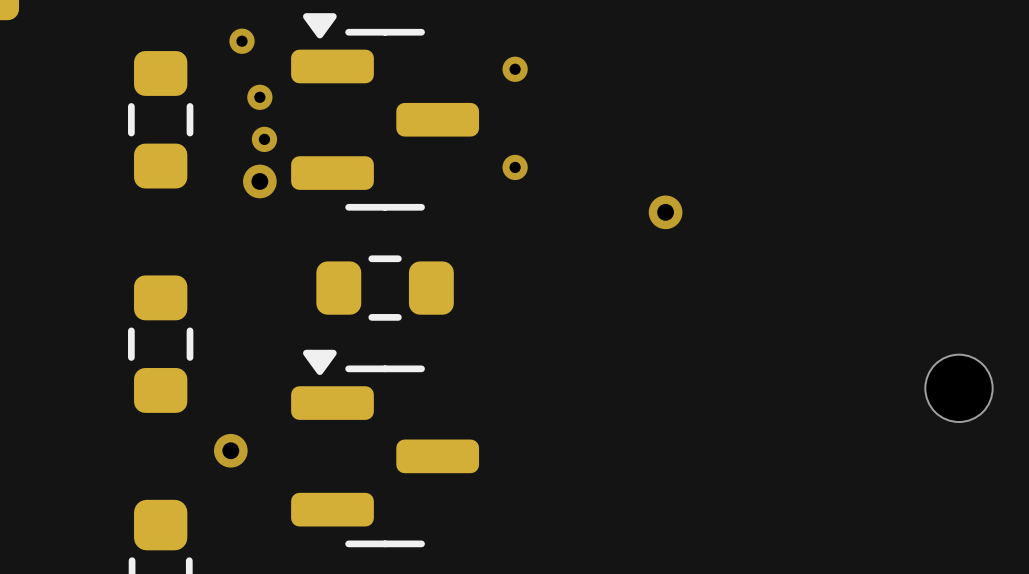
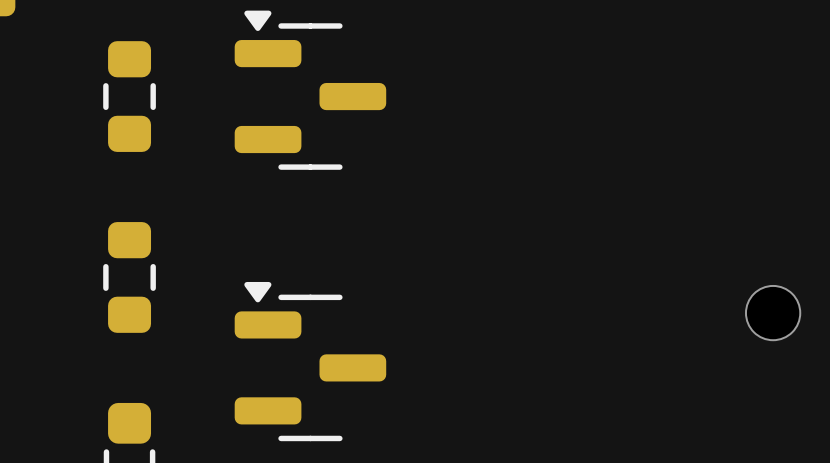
via: (242, 41) -> none
via: (515, 69) -> none
via: (259, 97) -> none
via: (264, 139) -> none
via: (515, 167) -> none
via: (259, 181) -> none
via: (665, 212) -> none
part: (385, 288) -> none
via: (230, 450) -> none

